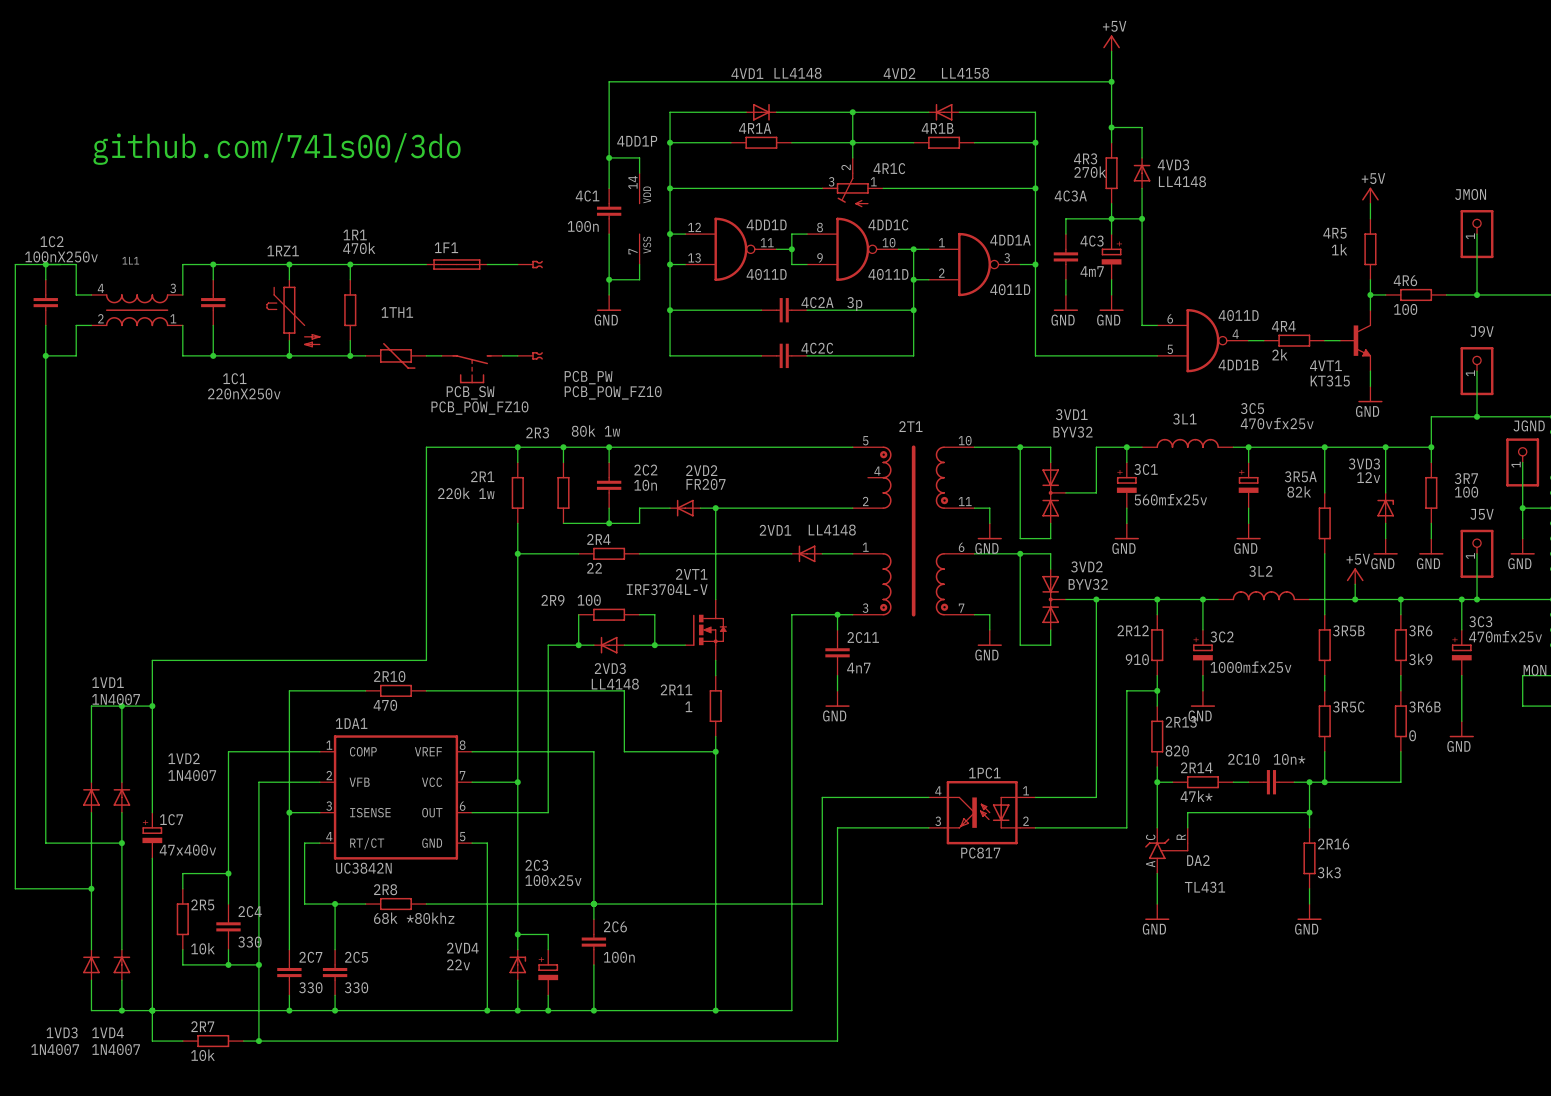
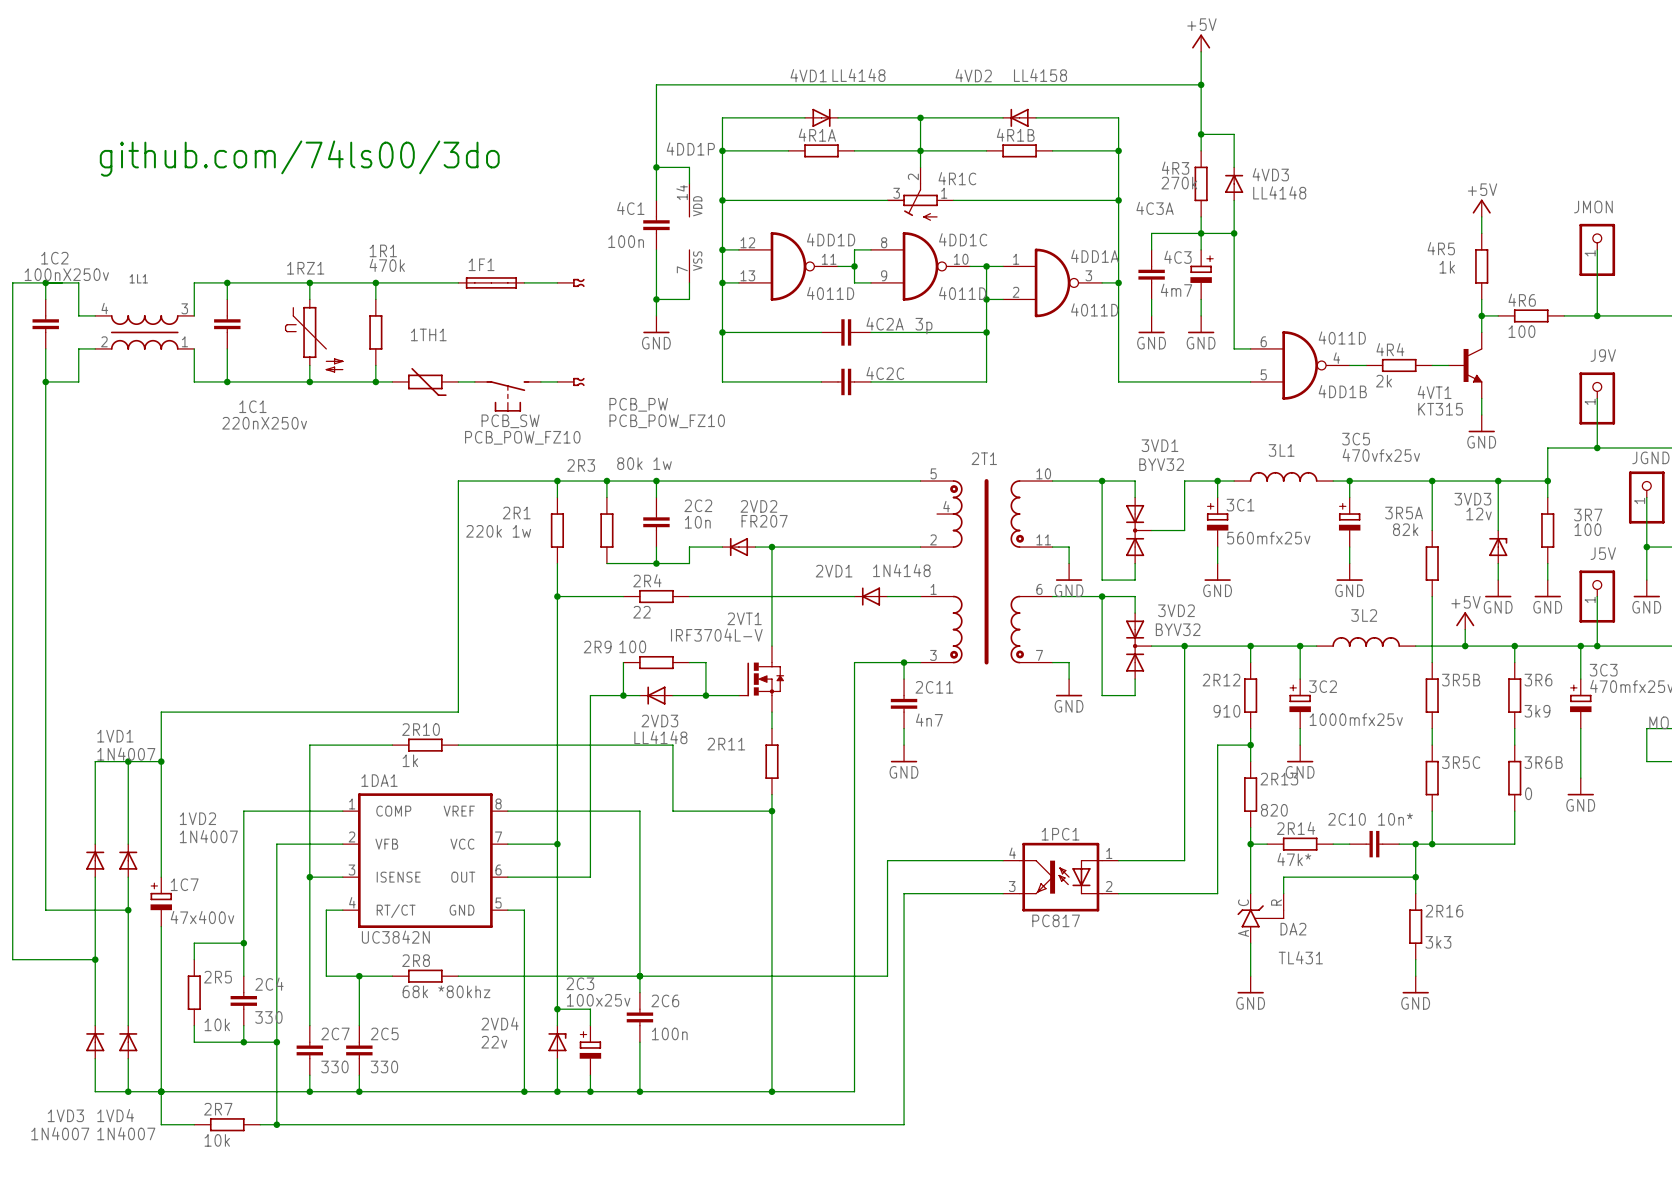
2VD1 value: LL4148 (832, 530) -> 1N4148 (901, 570)
2R10 value: 470 (385, 705) -> 1k (410, 760)
2R11 value: 1 (688, 706) -> none
2C3 name position: 2C3 (536, 865) -> 2C3 (580, 983)
2C3 value position: 100x25v (553, 880) -> 100x25v (598, 1000)

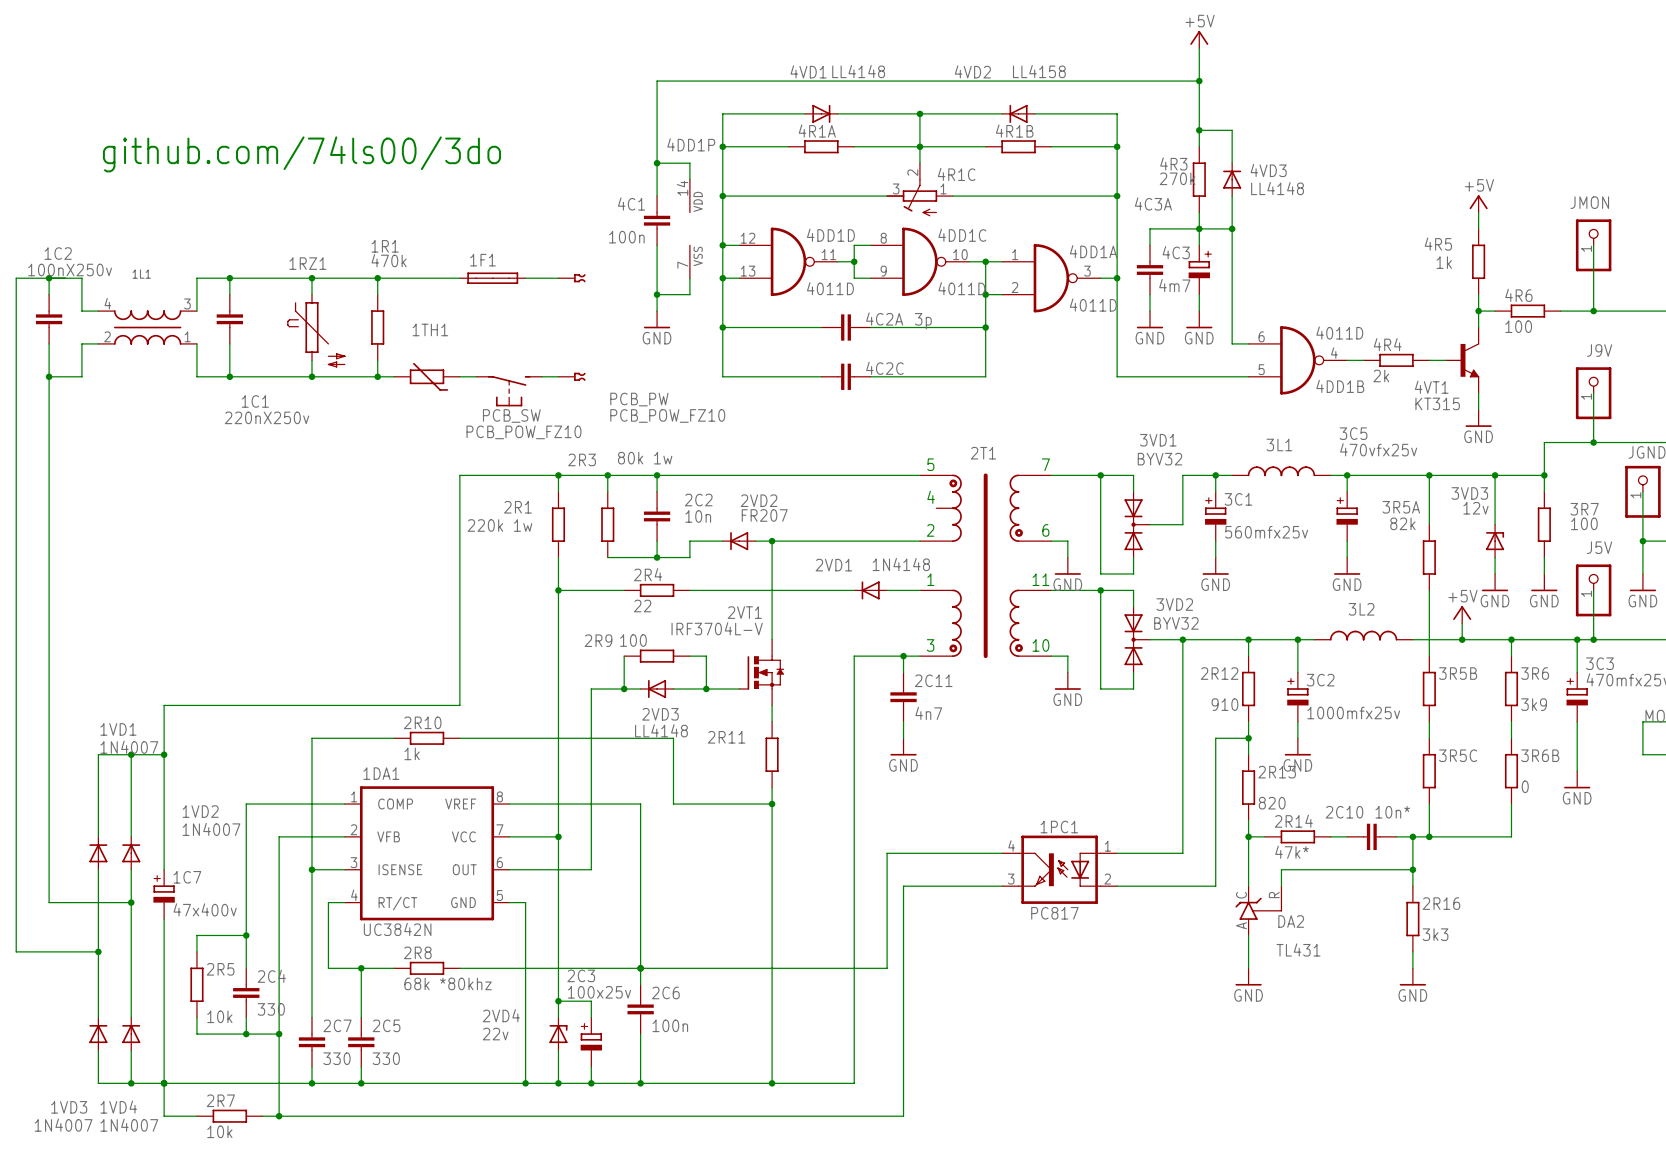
text: none -> 5 (930, 464)
text: none -> 7 (1045, 464)
2T1 symbol: [920, 479, 1053, 665] -> [919, 473, 1052, 659]
text: none -> 4 (931, 497)
text: none -> 2 (930, 530)
text: none -> 6 (1045, 530)
text: none -> 1 (930, 579)
text: none -> 11 (1040, 579)
text: none -> 3 (930, 645)
text: none -> 10 (1040, 645)

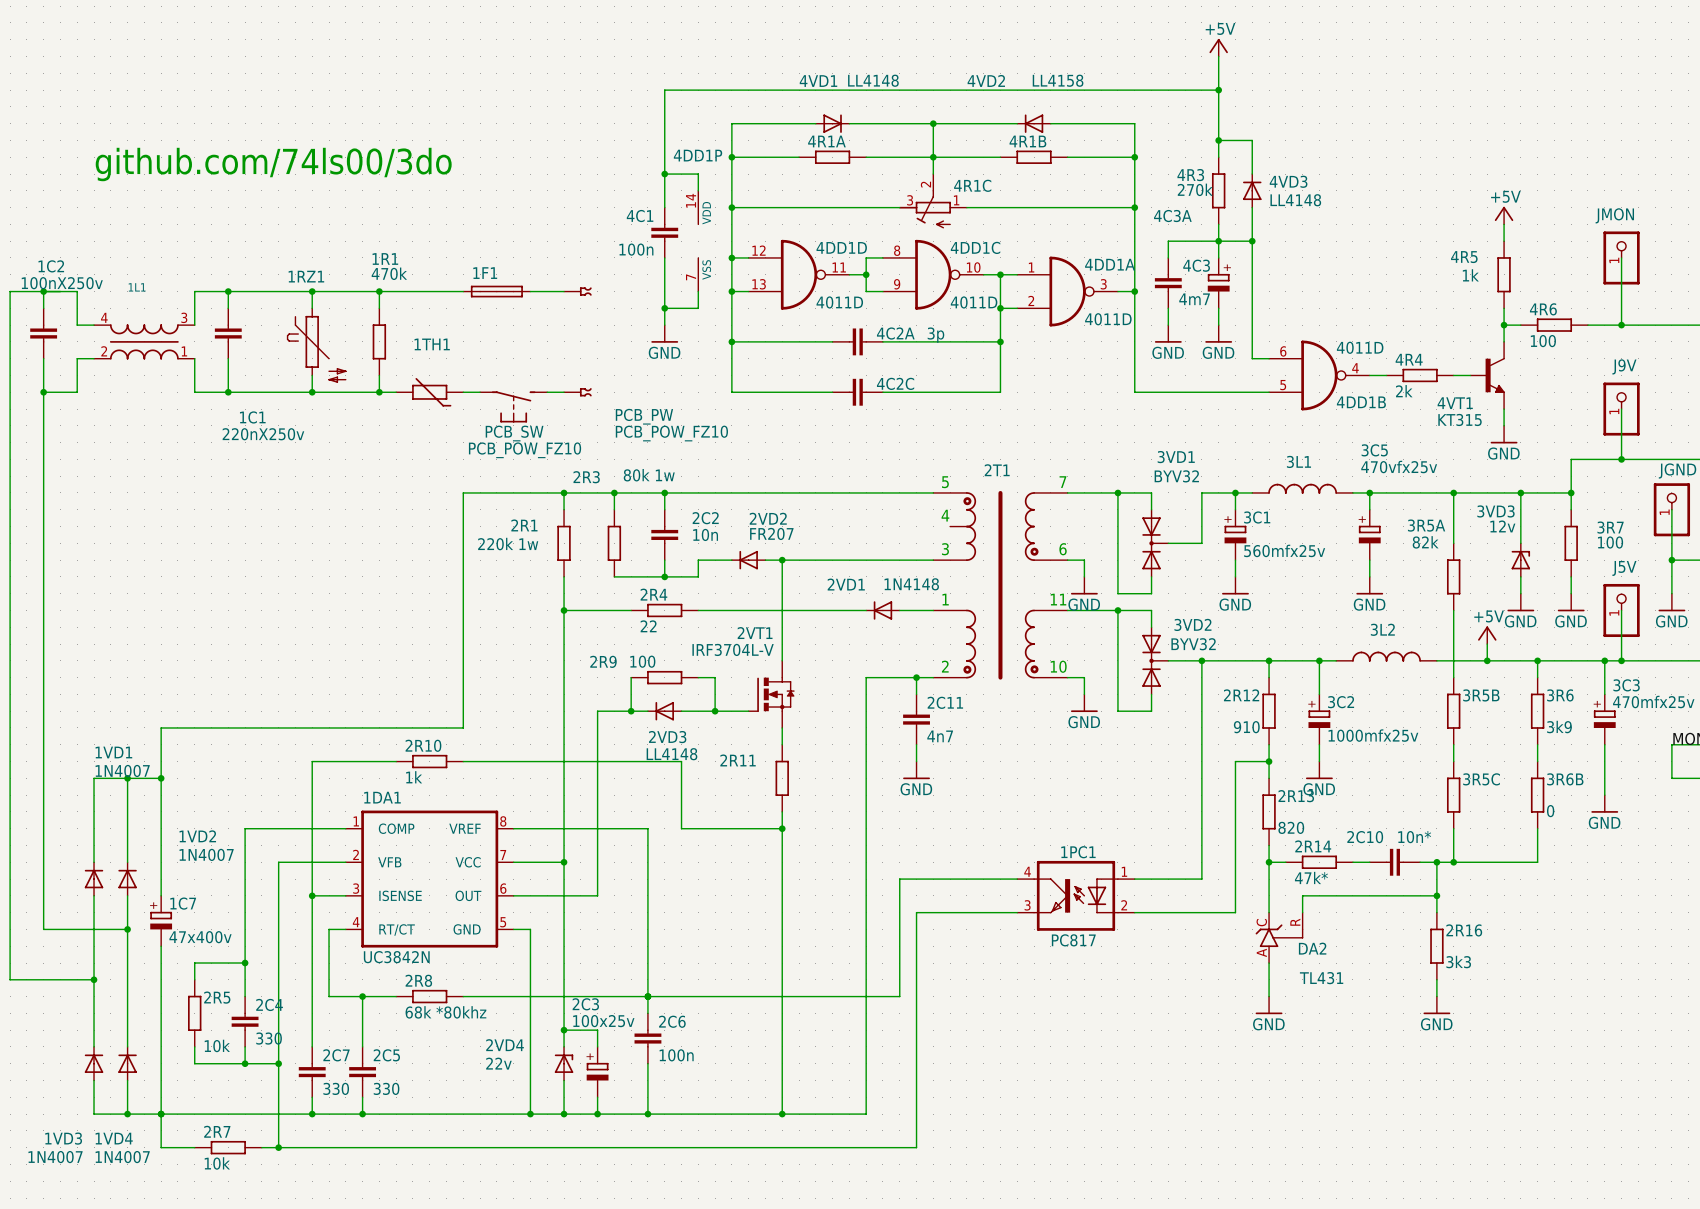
text: 2 (930, 530) -> 3 (945, 549)
text: 3 (930, 645) -> 2 (945, 666)

